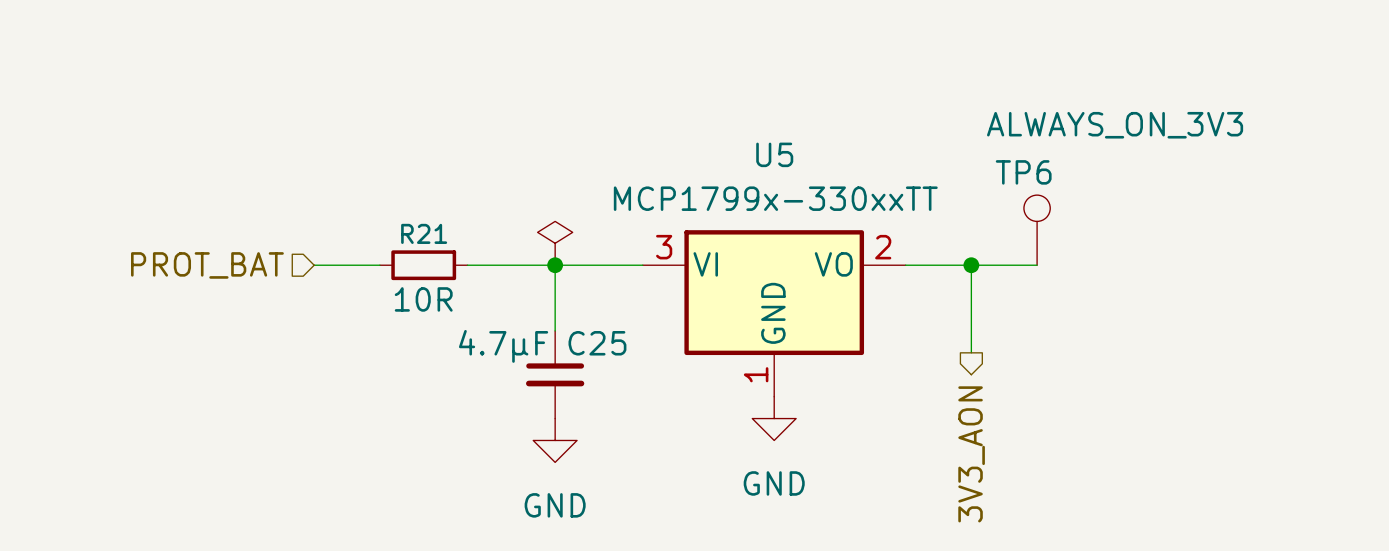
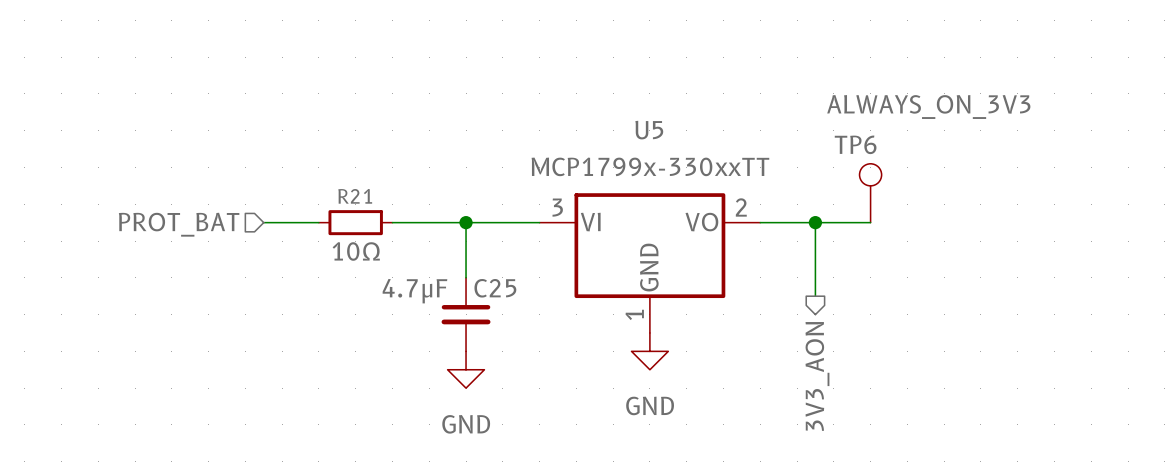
power symbol: (555, 243) -> none
R21 value: 10R (423, 299) -> 10Ω (356, 251)

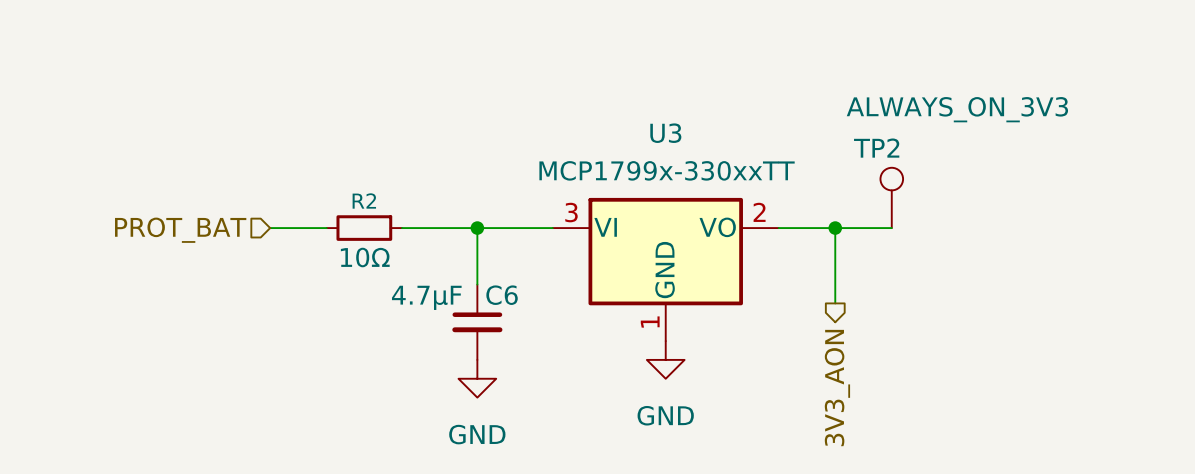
U5 name: U5 (649, 130) -> U3 (665, 133)
TP6 name: TP6 (855, 144) -> TP2 (876, 148)
R21 name: R21 (355, 196) -> R2 (364, 200)
C25 name: C25 (495, 288) -> C6 (502, 295)

